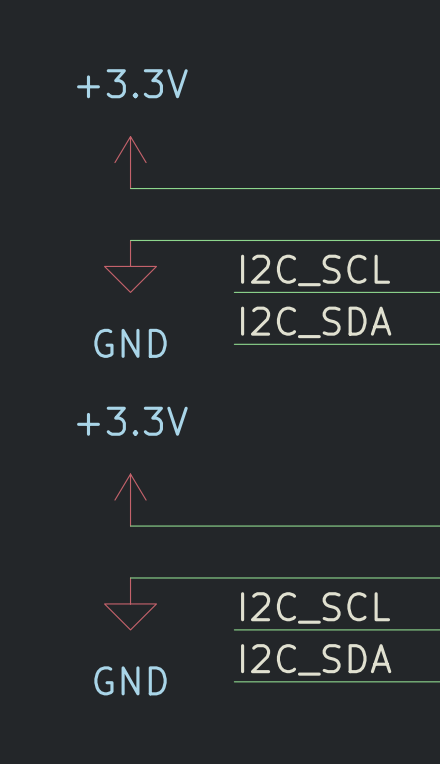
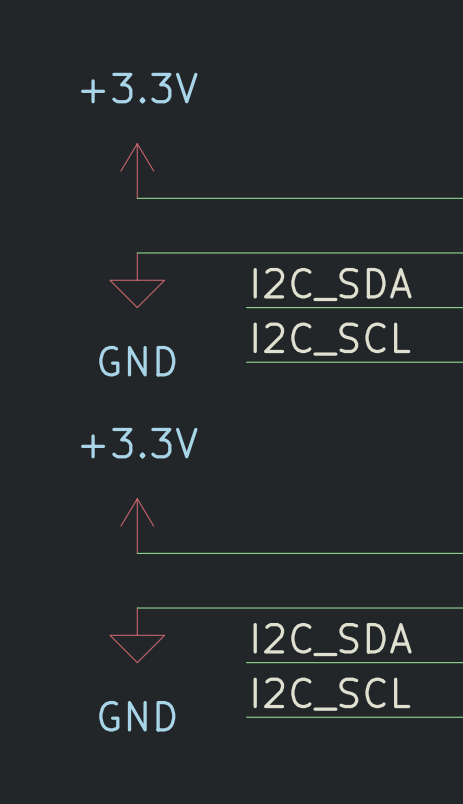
label: I2C_SCL (315, 270) -> I2C_SDA (332, 284)
label: I2C_SDA (316, 322) -> I2C_SCL (331, 339)
label: I2C_SCL (315, 607) -> I2C_SDA (332, 639)
label: I2C_SDA (316, 659) -> I2C_SCL (331, 694)

